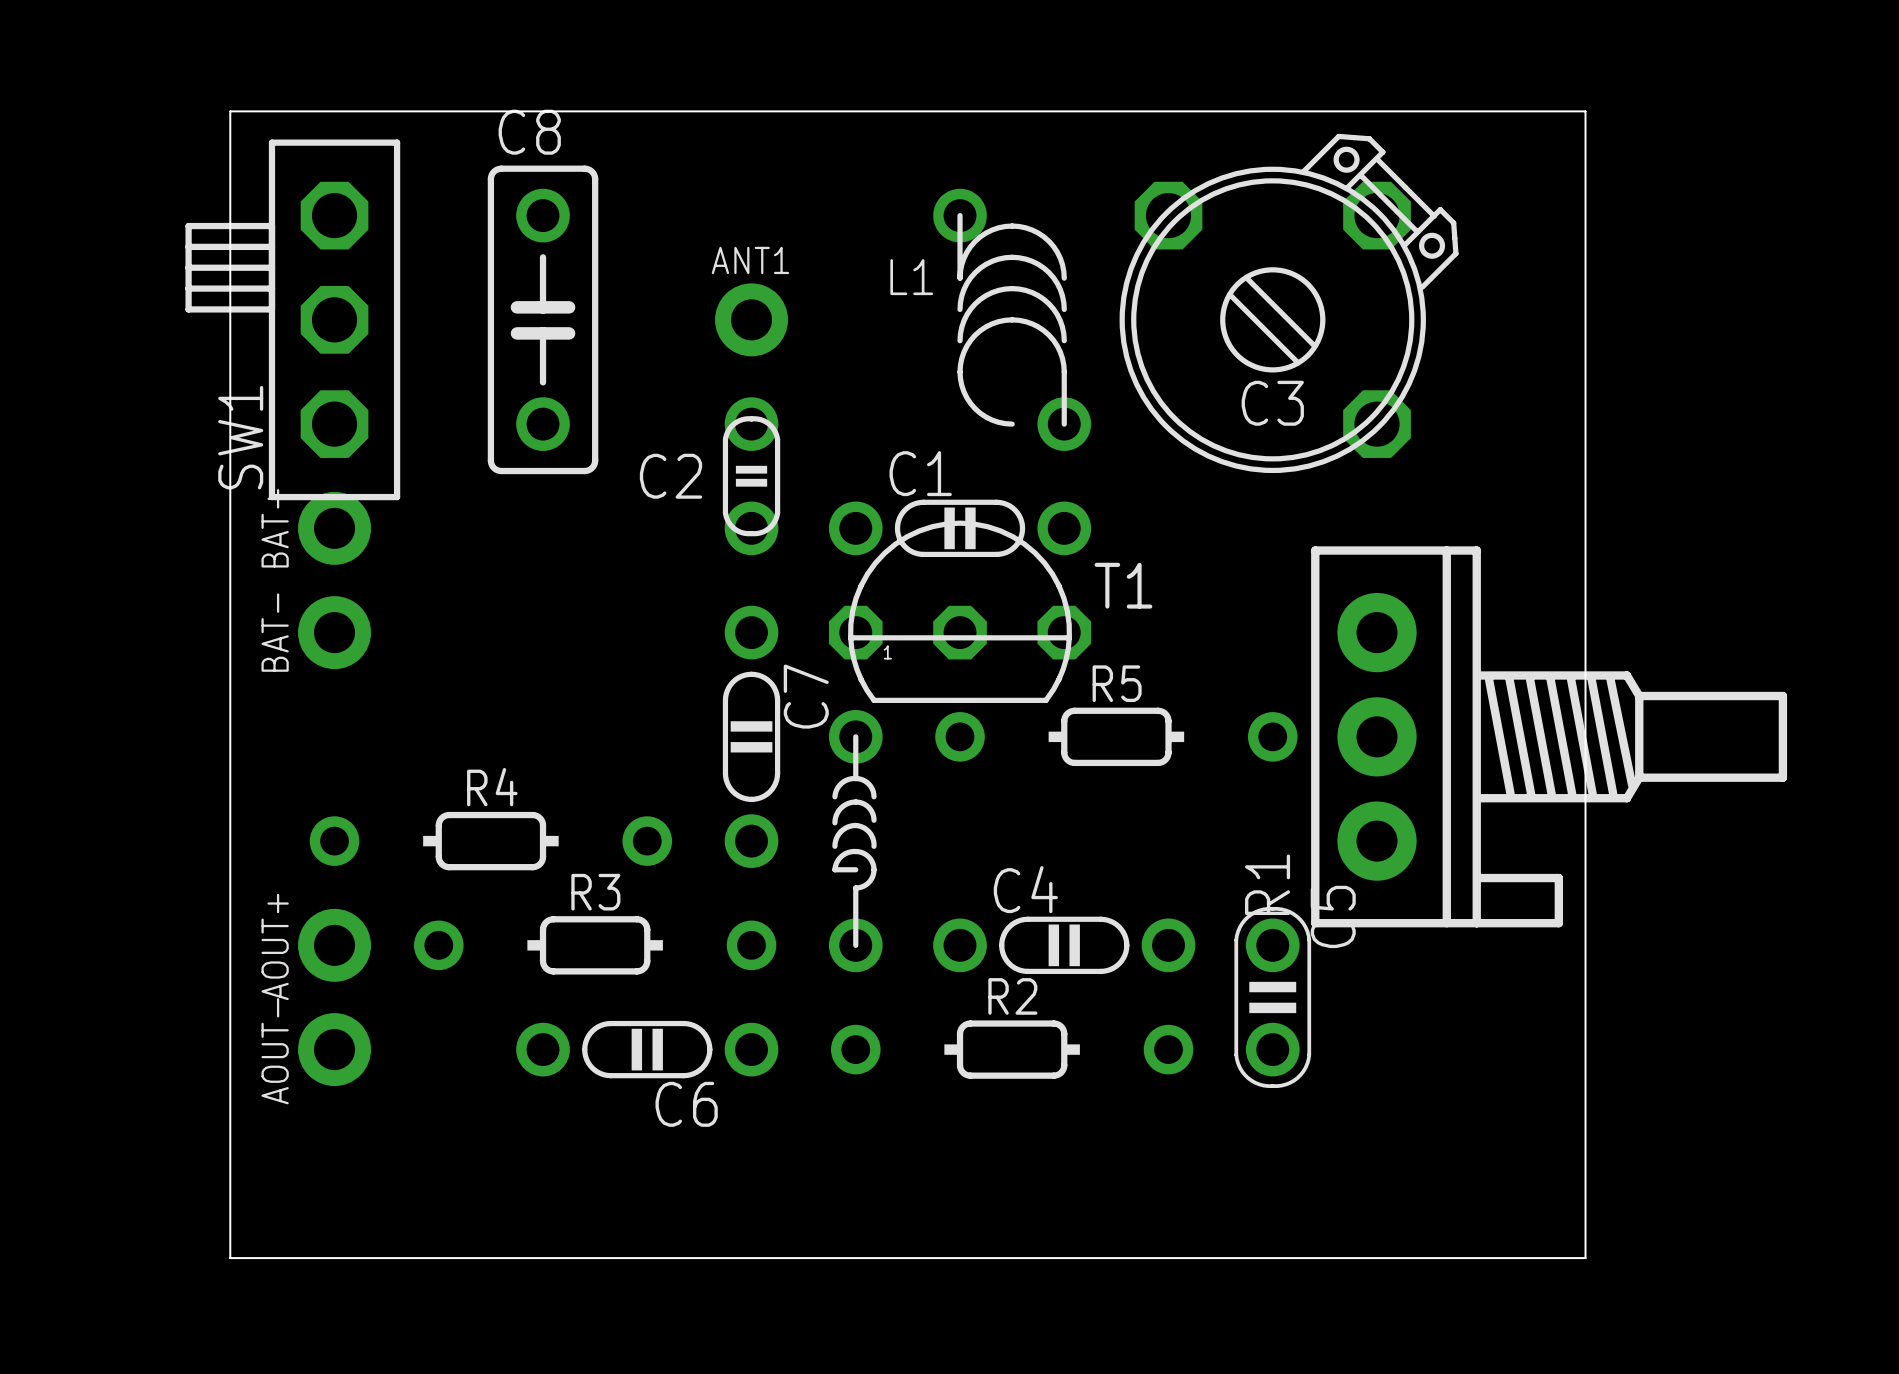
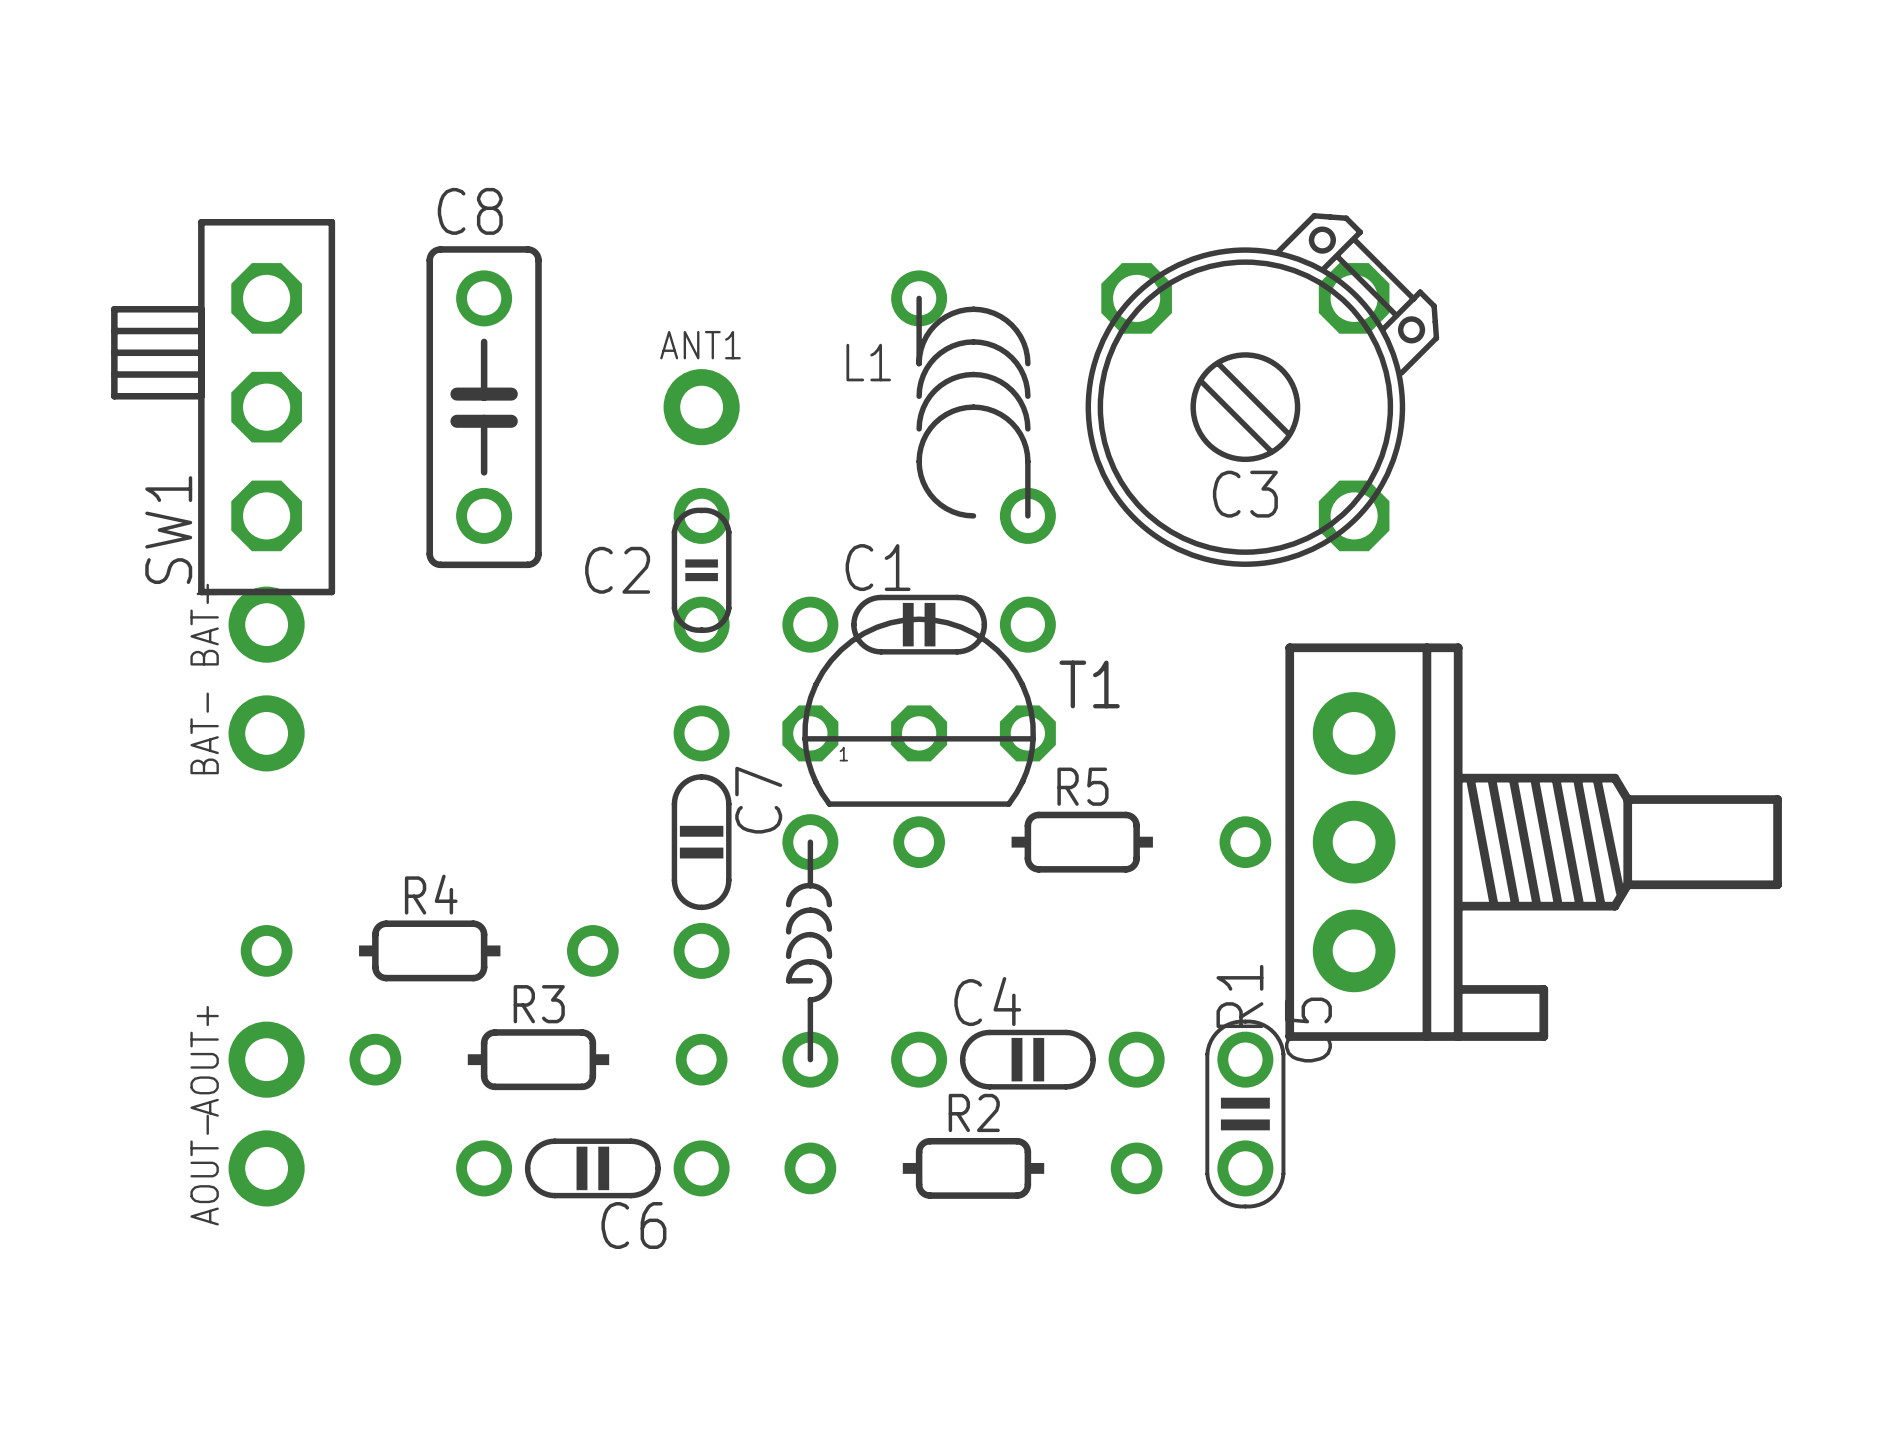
board edge: (230, 111) (1585, 111) (1585, 1258) (230, 1258) (230, 111) -> none

